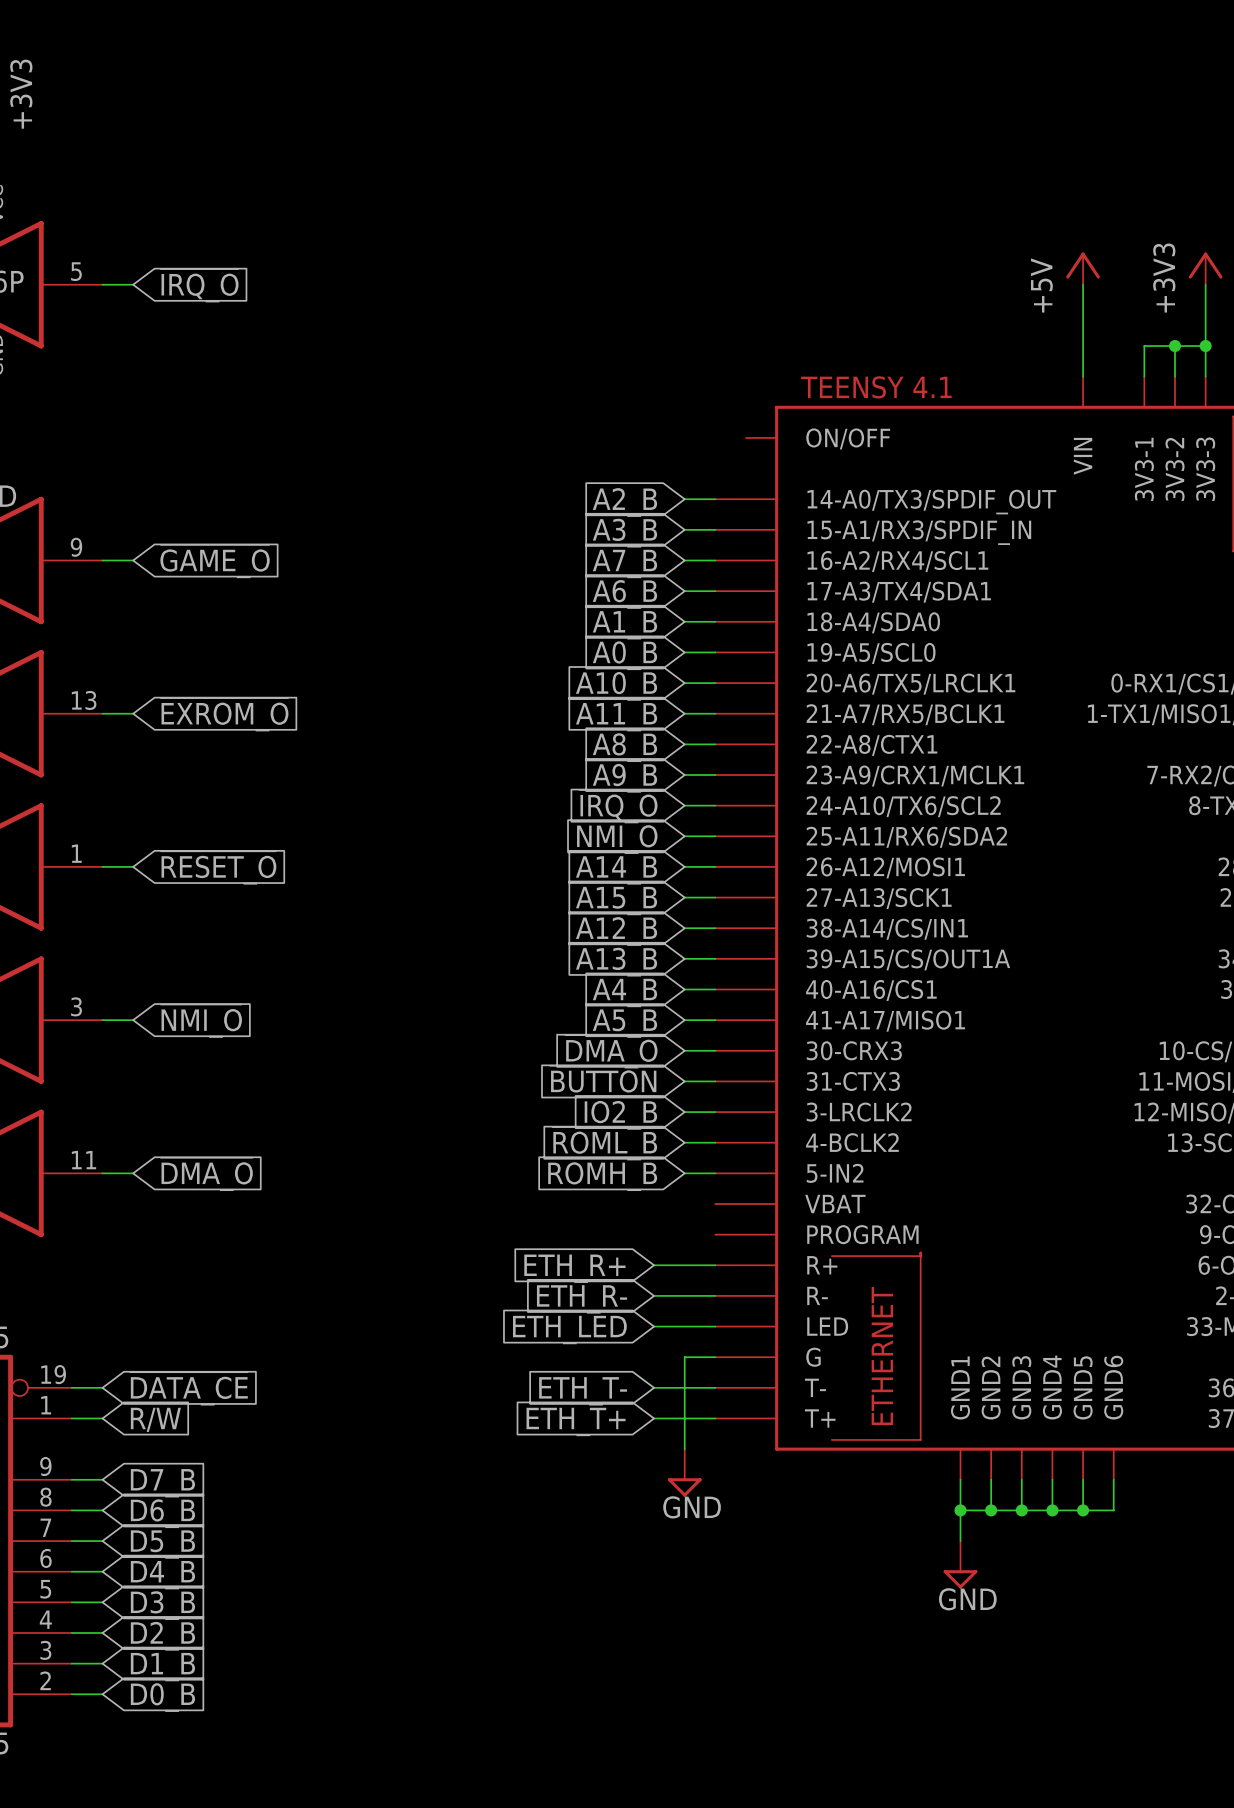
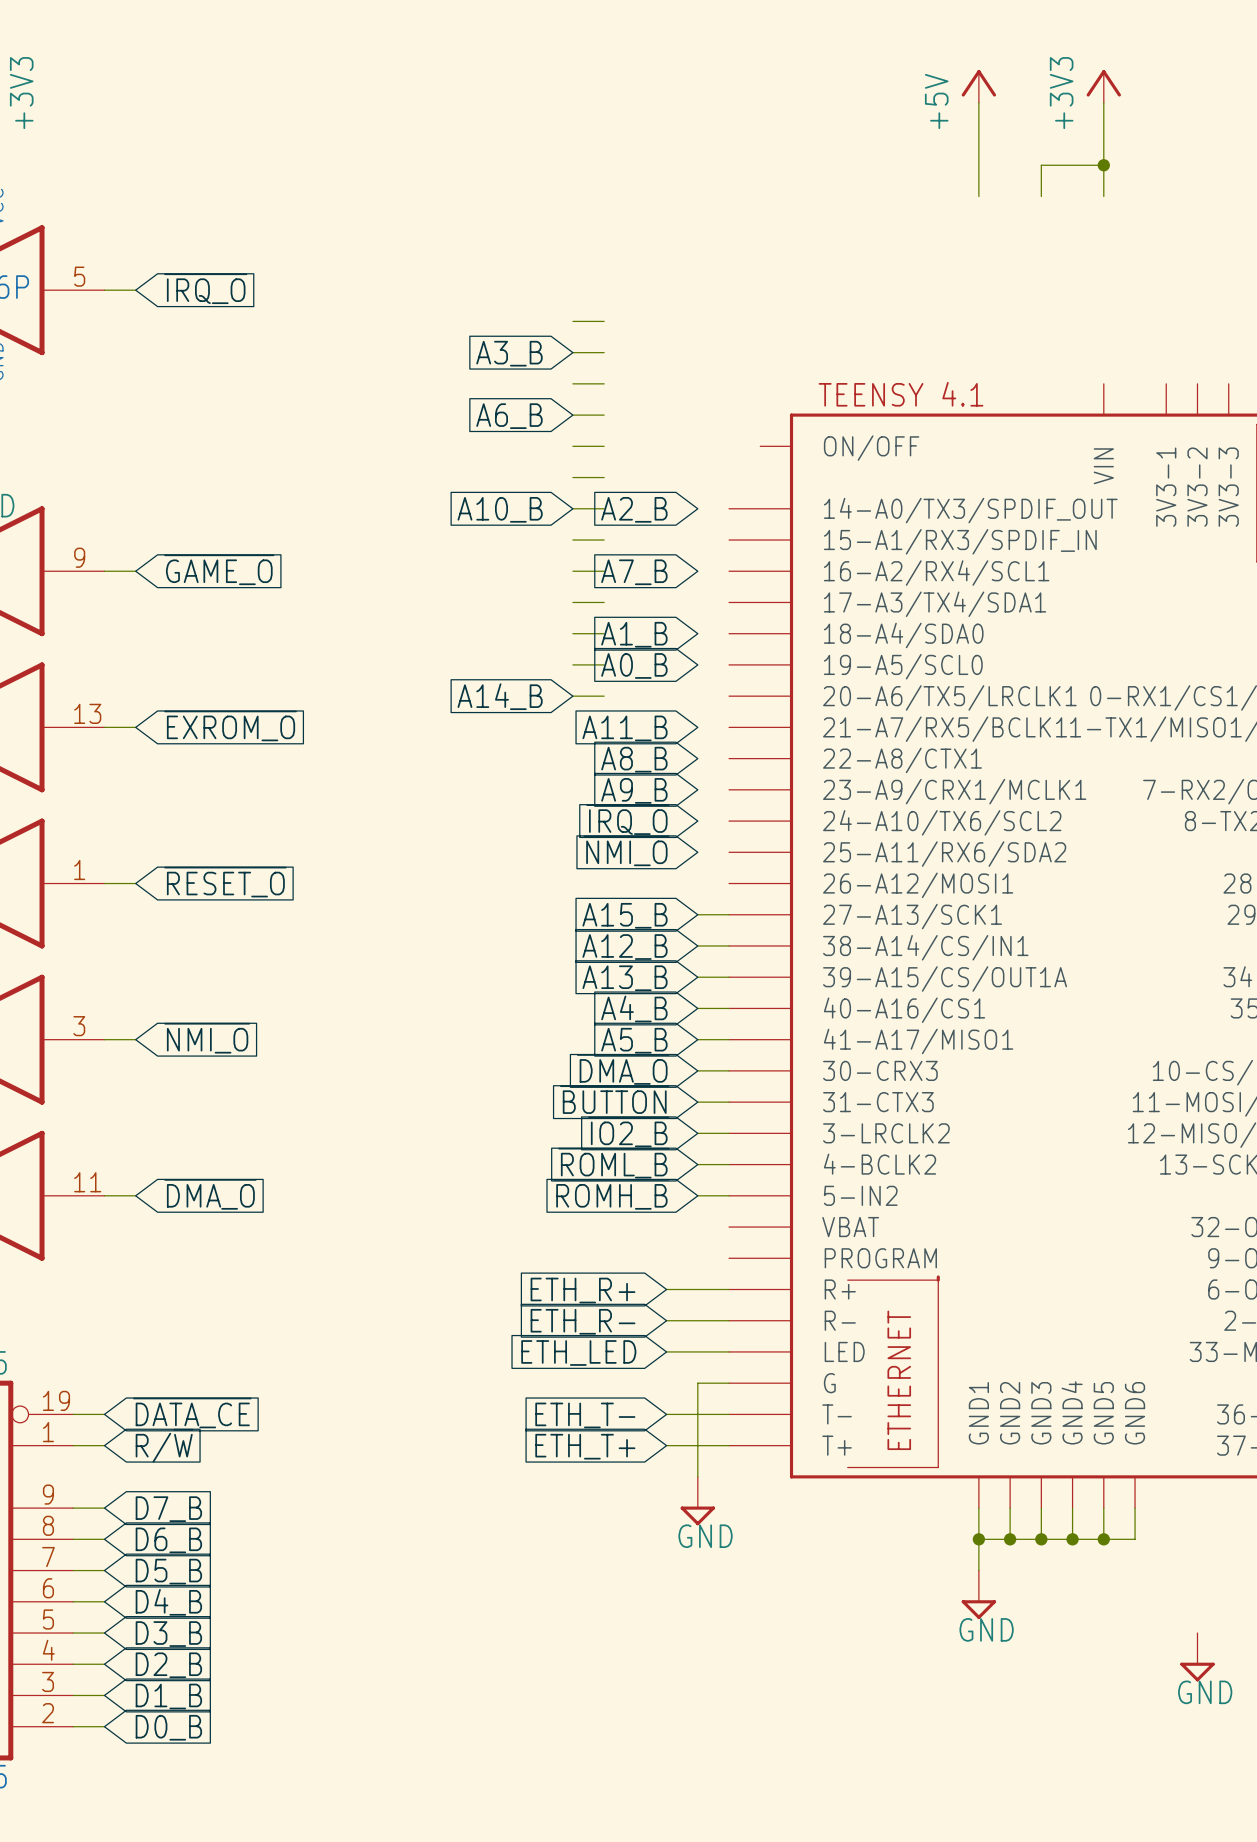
junction: none -> (1103, 165)
power symbol position: +5V (1083, 268) -> +5V (978, 86)
power symbol position: +3V3 (1205, 268) -> +3V3 (1103, 86)
wire: (1083, 284) (1083, 376) -> (978, 102) (978, 196)
wire: (1205, 284) (1205, 376) -> (1103, 102) (1103, 196)
wire: (1175, 346) (1175, 376) -> none
junction: (1175, 346) -> none
wire: (1205, 346) (1144, 346) (1144, 376) -> (1103, 165) (1041, 165) (1041, 196)
junction: (1205, 346) -> none
wire: (684, 499) (715, 499) -> (572, 321) (604, 321)
wire: (684, 529) (715, 529) -> (572, 352) (604, 352)
global label position: A3_B (624, 533) -> A3_B (509, 353)
wire: (684, 560) (715, 560) -> (572, 383) (604, 383)
wire: (684, 591) (715, 591) -> (572, 415) (604, 415)
global label position: A6_B (624, 594) -> A6_B (509, 416)
wire: (684, 621) (715, 621) -> (572, 446) (604, 446)
wire: (684, 652) (715, 652) -> (572, 477) (604, 477)
wire: (684, 683) (715, 683) -> (572, 508) (604, 508)
global label position: A10_B (616, 686) -> A10_B (500, 509)
wire: (684, 713) (715, 713) -> (572, 540) (604, 540)
wire: (684, 744) (715, 744) -> (572, 571) (604, 571)
wire: (684, 775) (715, 775) -> (572, 602) (604, 602)
wire: (684, 805) (715, 805) -> (572, 633) (604, 633)
wire: (684, 836) (715, 836) -> (572, 664) (604, 664)
wire: (684, 866) (715, 866) -> (572, 696) (604, 696)
global label position: A14_B (616, 870) -> A14_B (500, 696)
power symbol: none -> GND (1197, 1657)

